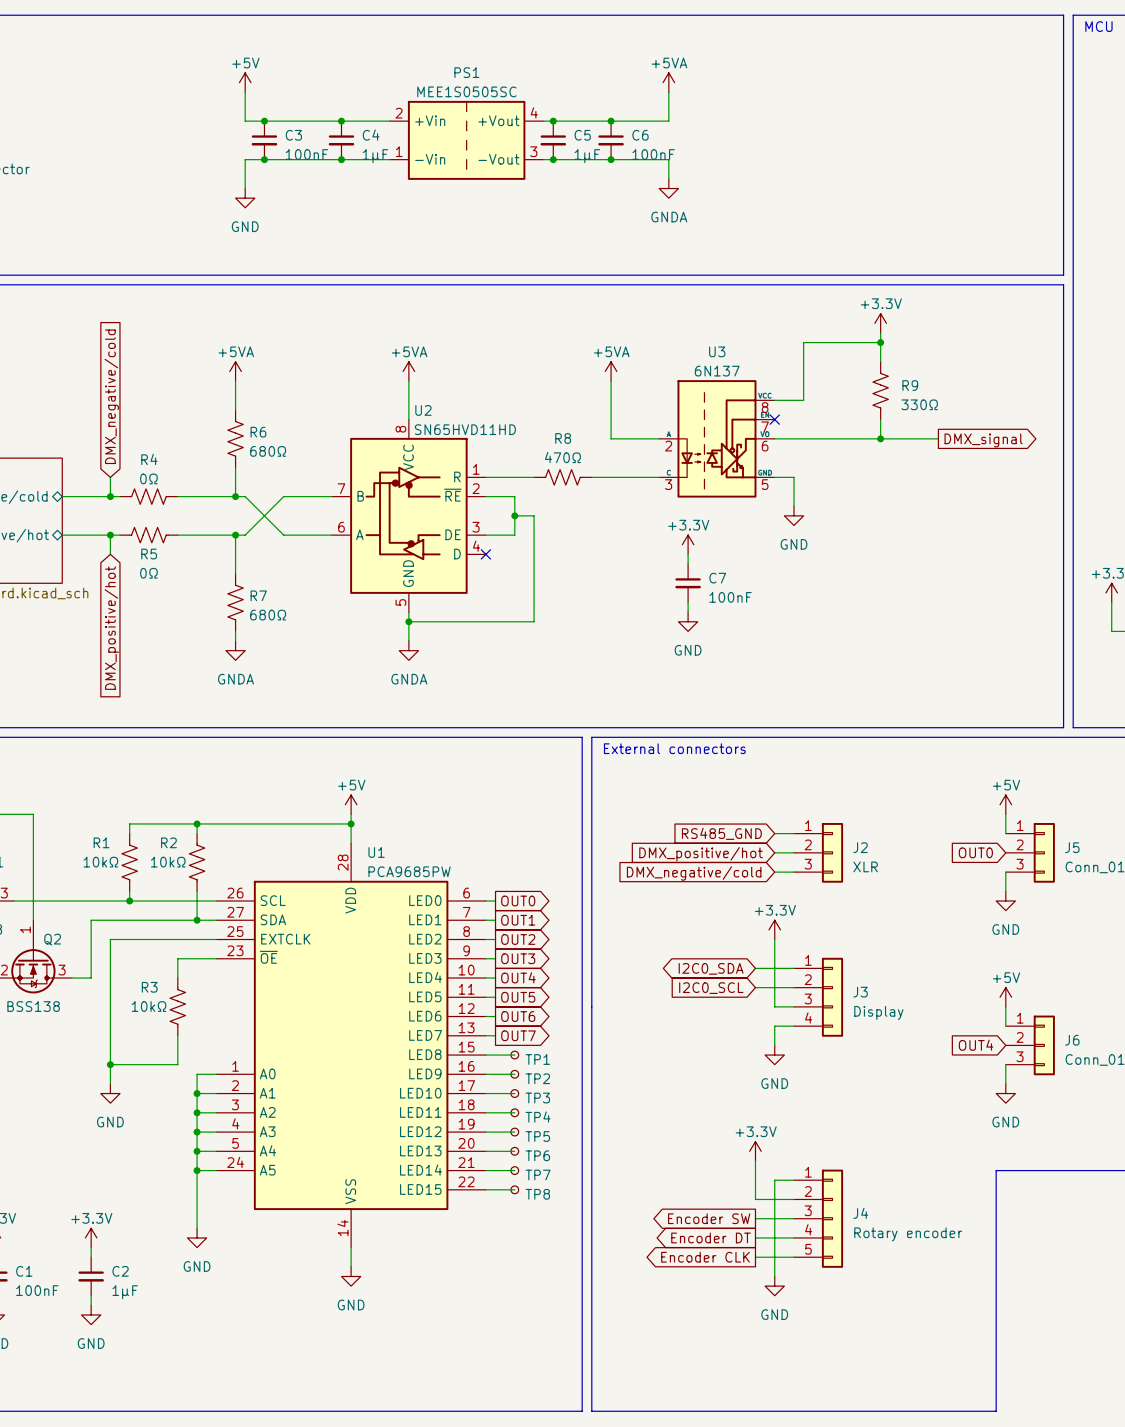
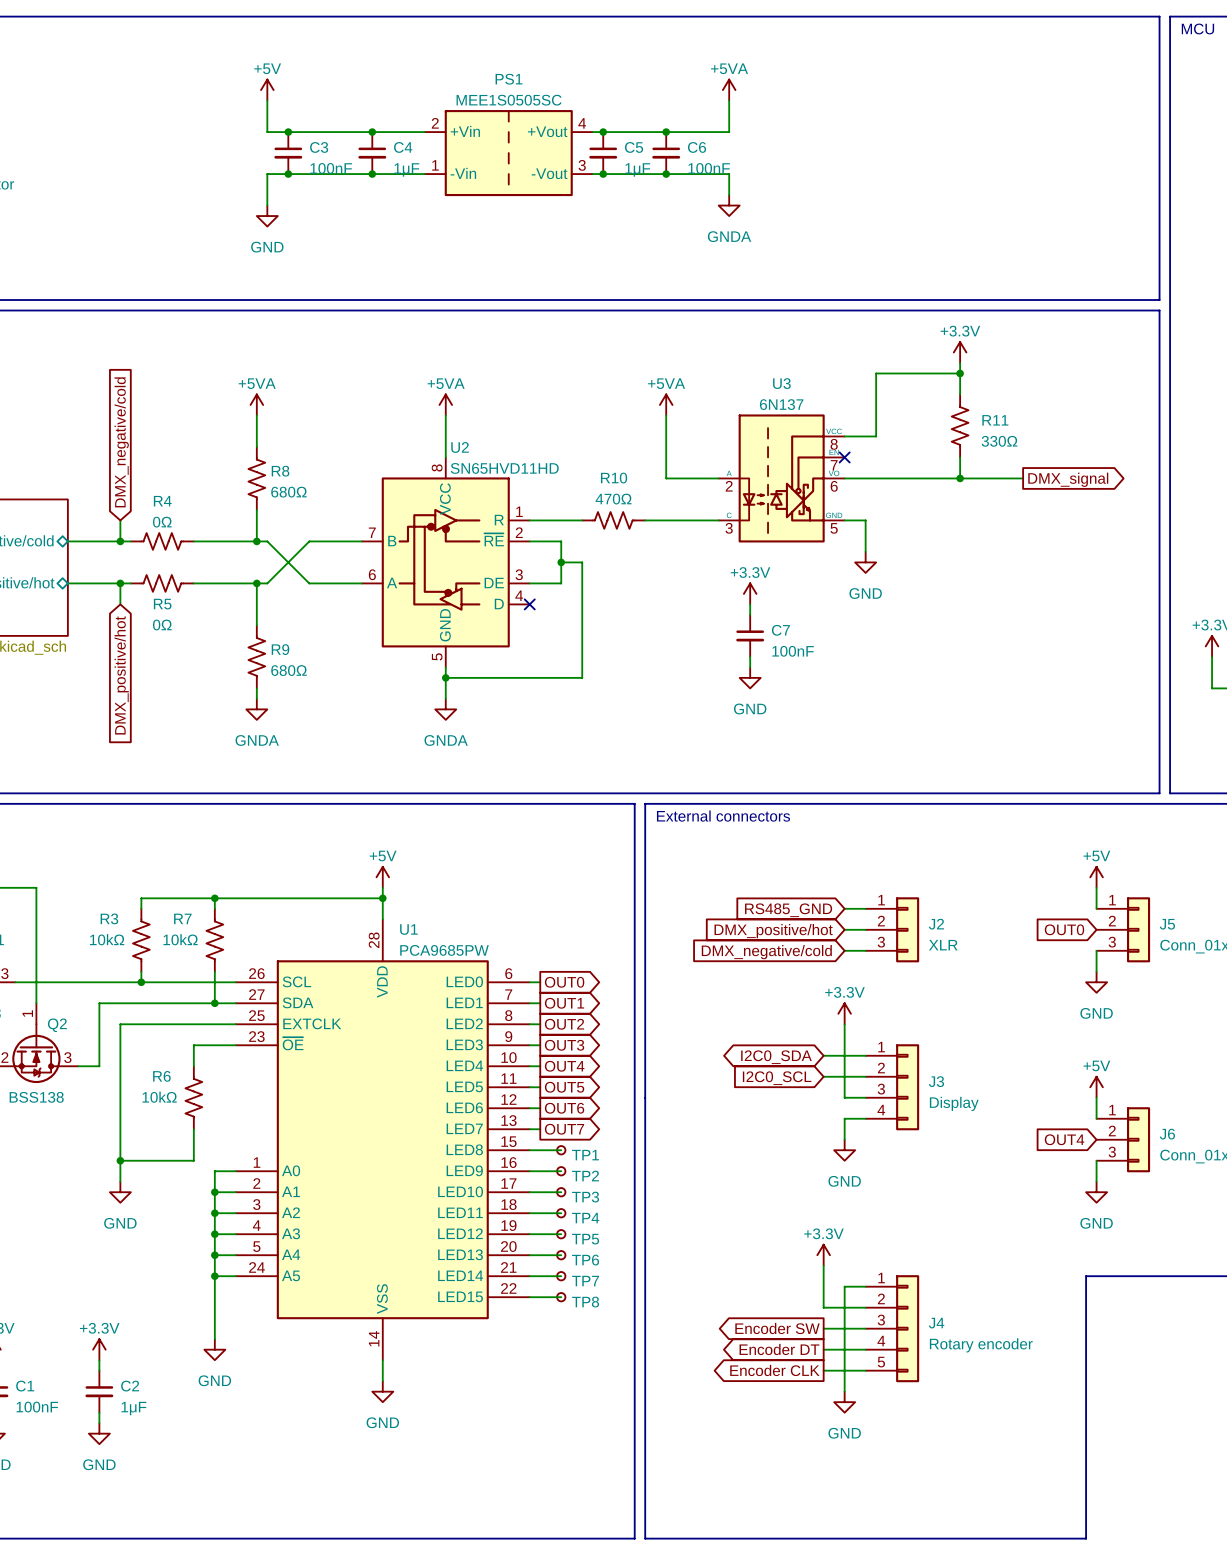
R9 name: R9 (910, 385) -> R11 (995, 420)
R6 name: R6 (258, 432) -> R8 (280, 471)
R8 name: R8 (563, 438) -> R10 (614, 478)
R7 name: R7 (258, 595) -> R9 (280, 649)
R1 name: R1 (101, 842) -> R3 (109, 918)
R2 name: R2 (168, 842) -> R7 (182, 918)
R3 name: R3 (149, 987) -> R6 (161, 1076)

